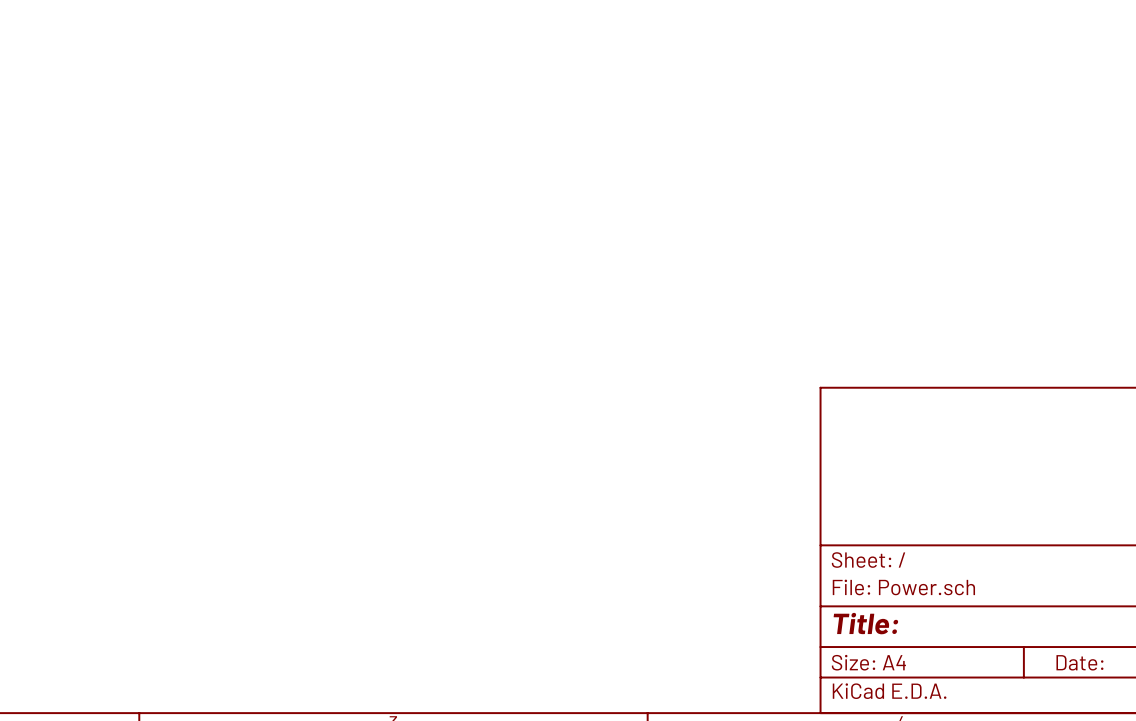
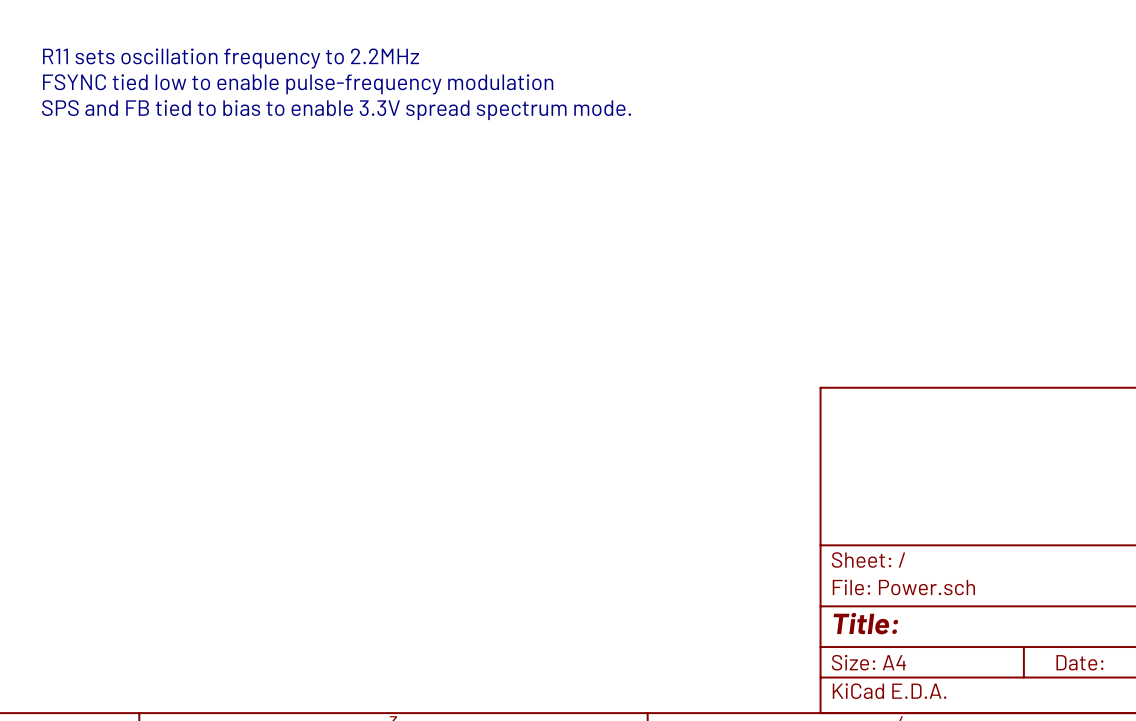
text: none -> R11 sets oscillation frequency to 2.2MHz (231, 58)
text: none -> FSYNC tied low to enable pulse-frequency modulation (298, 84)
text: none -> SPS and FB tied to bias to enable 3.3V spread spectrum mode. (336, 110)

